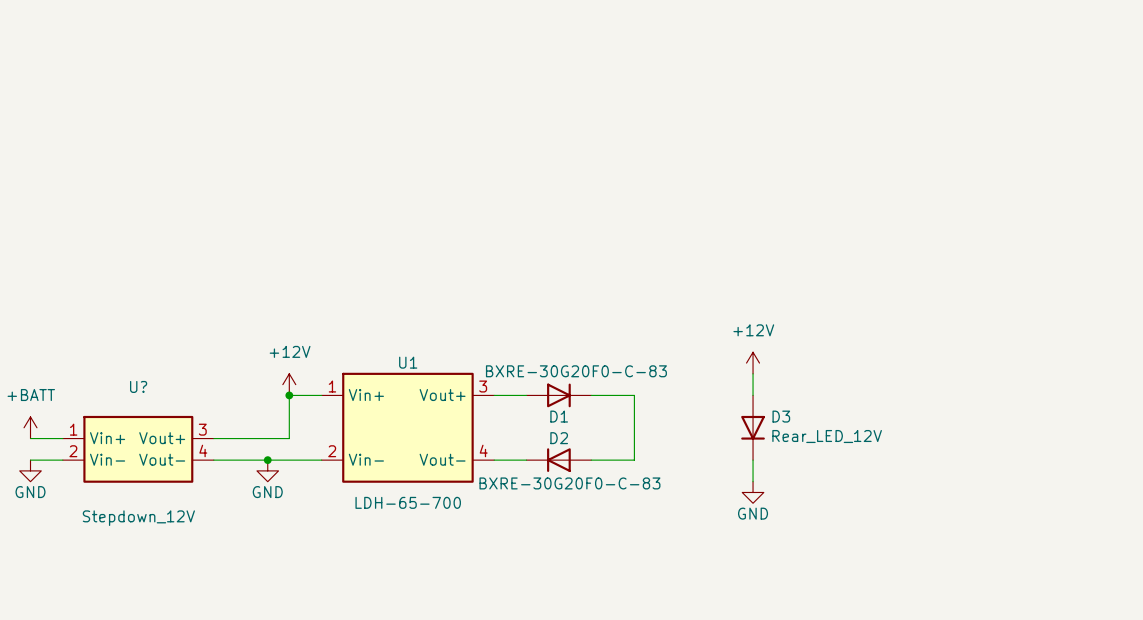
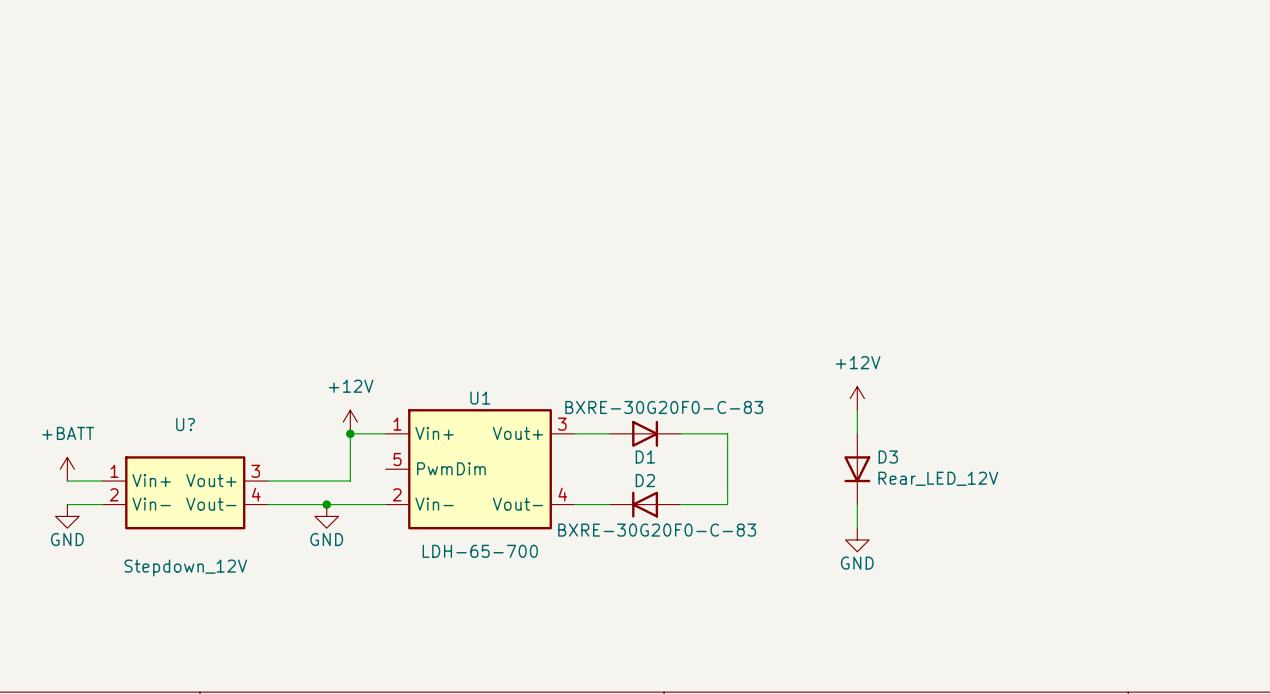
U1 symbol: [321, 372, 495, 483] -> [385, 409, 575, 530]

